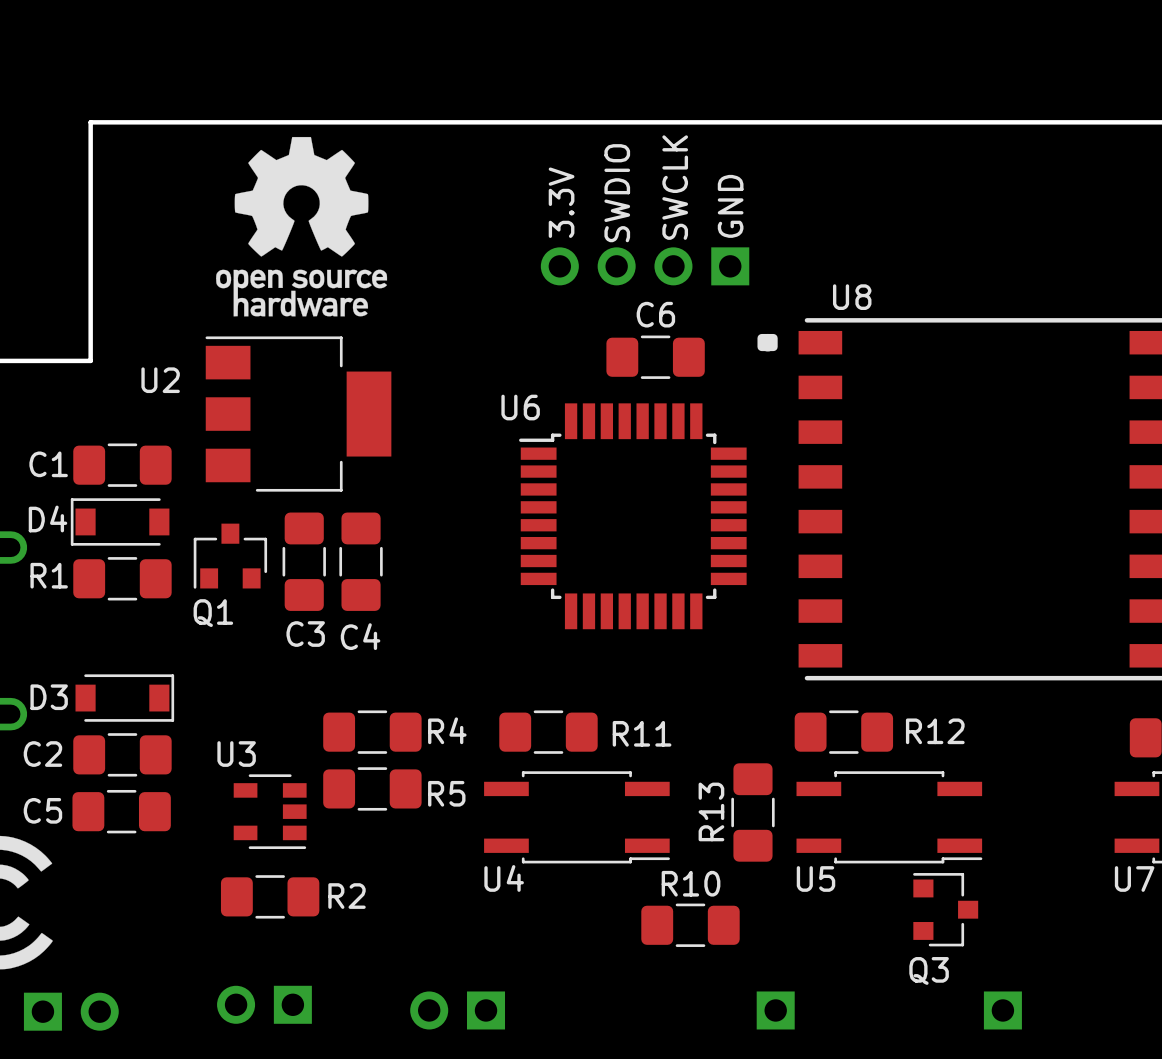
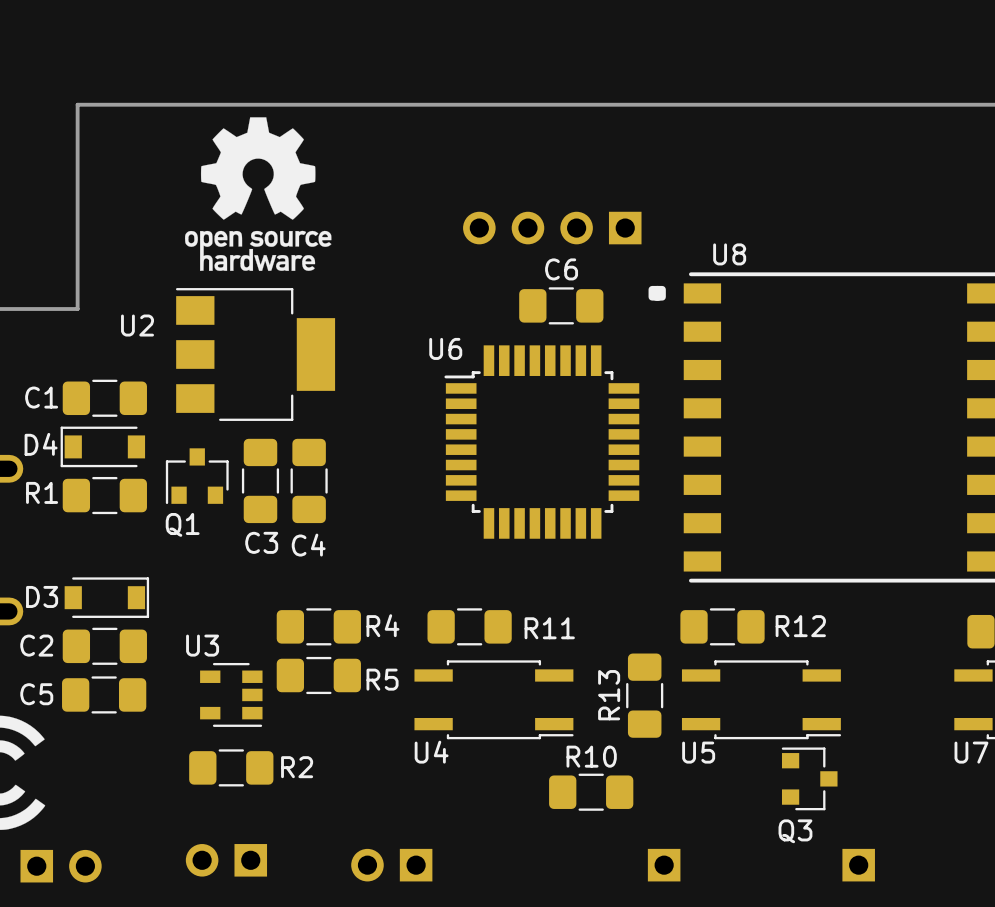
text: SWCLK (675, 187) -> none
text: SWDIO (617, 193) -> none
text: 3.3V (561, 202) -> none
text: GND (730, 206) -> none

